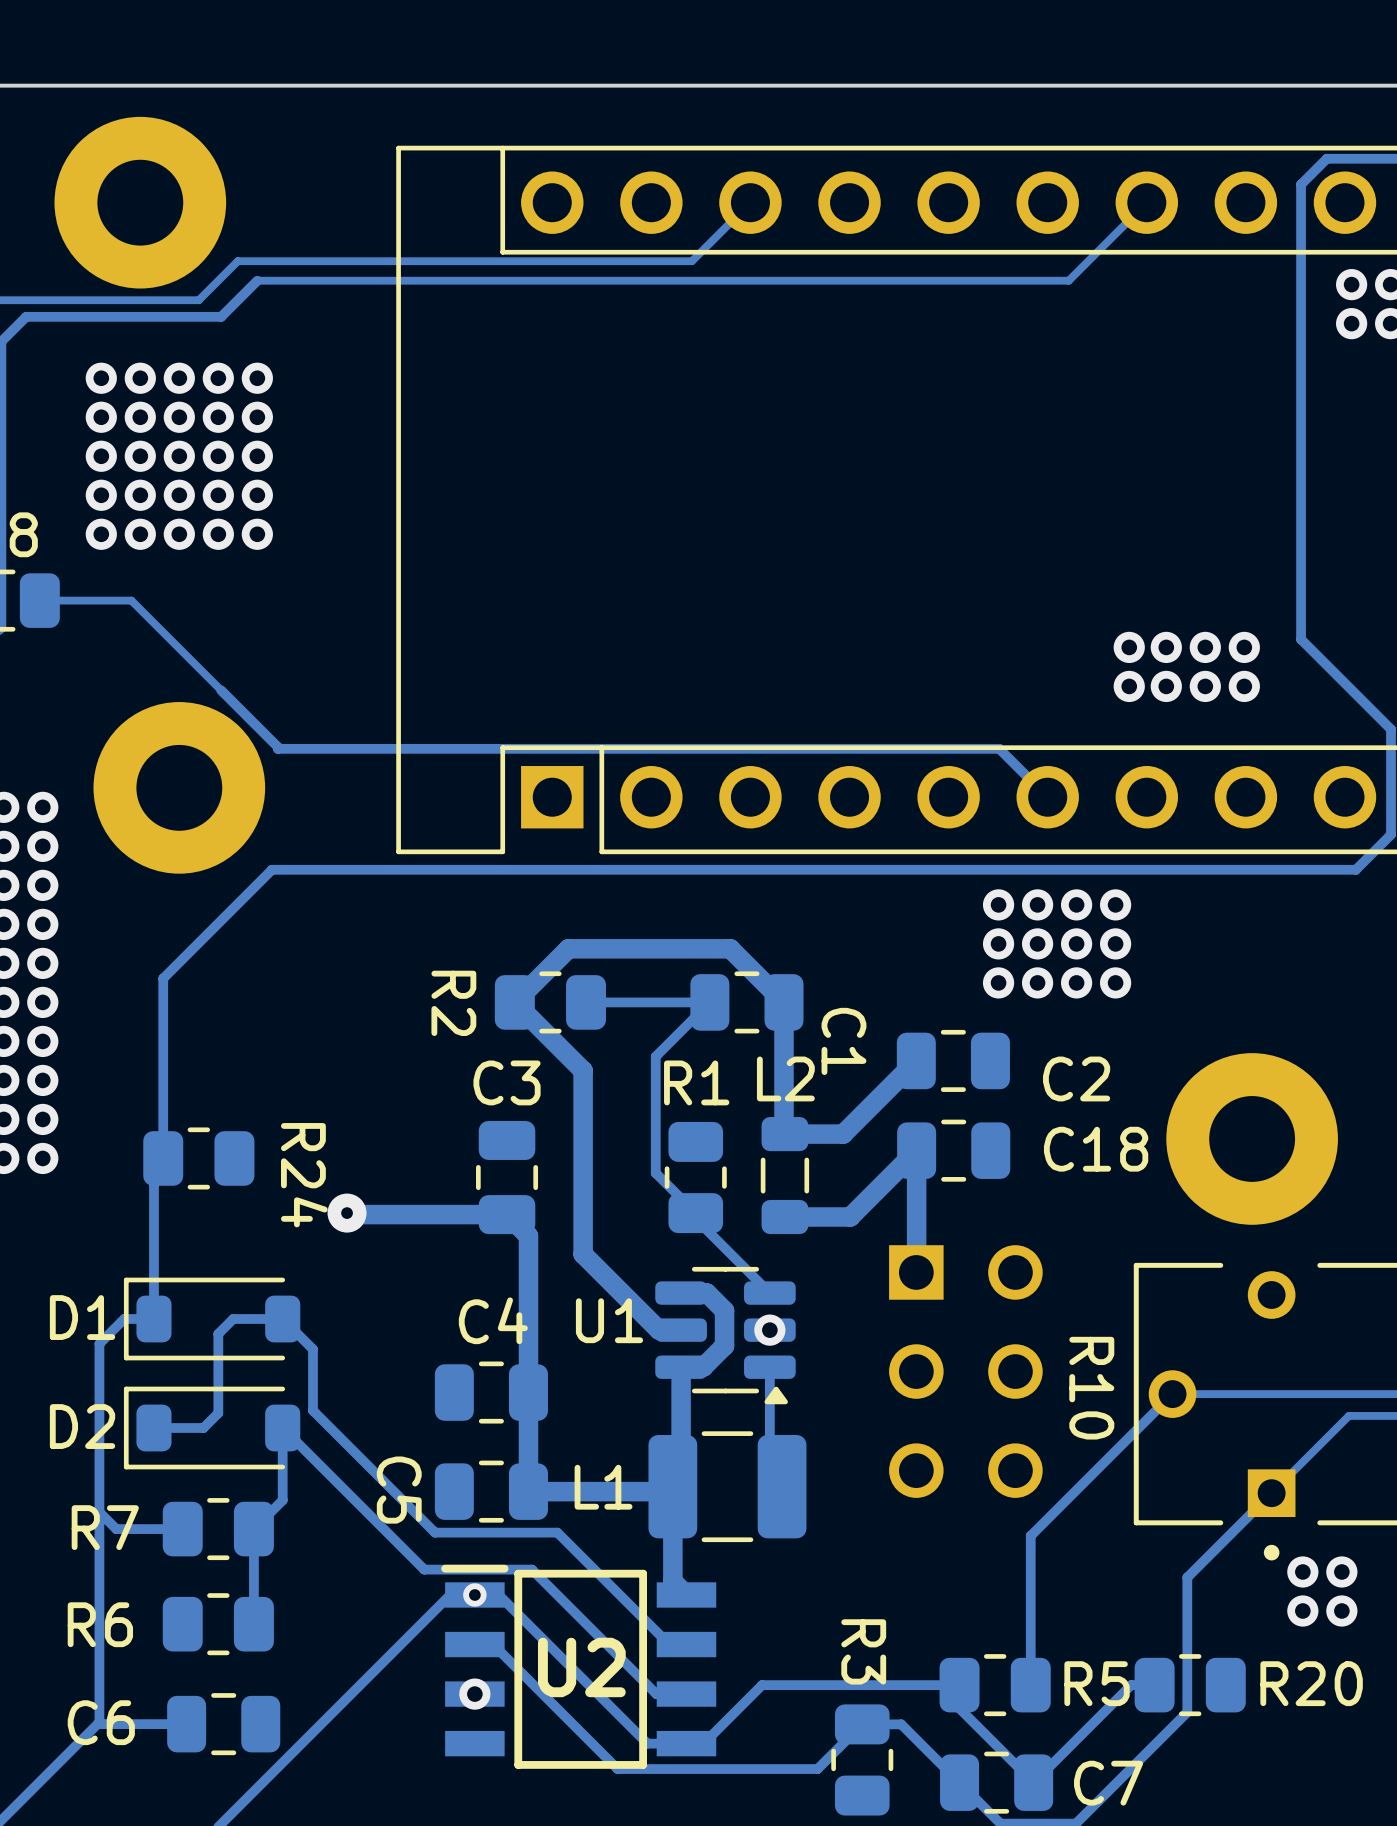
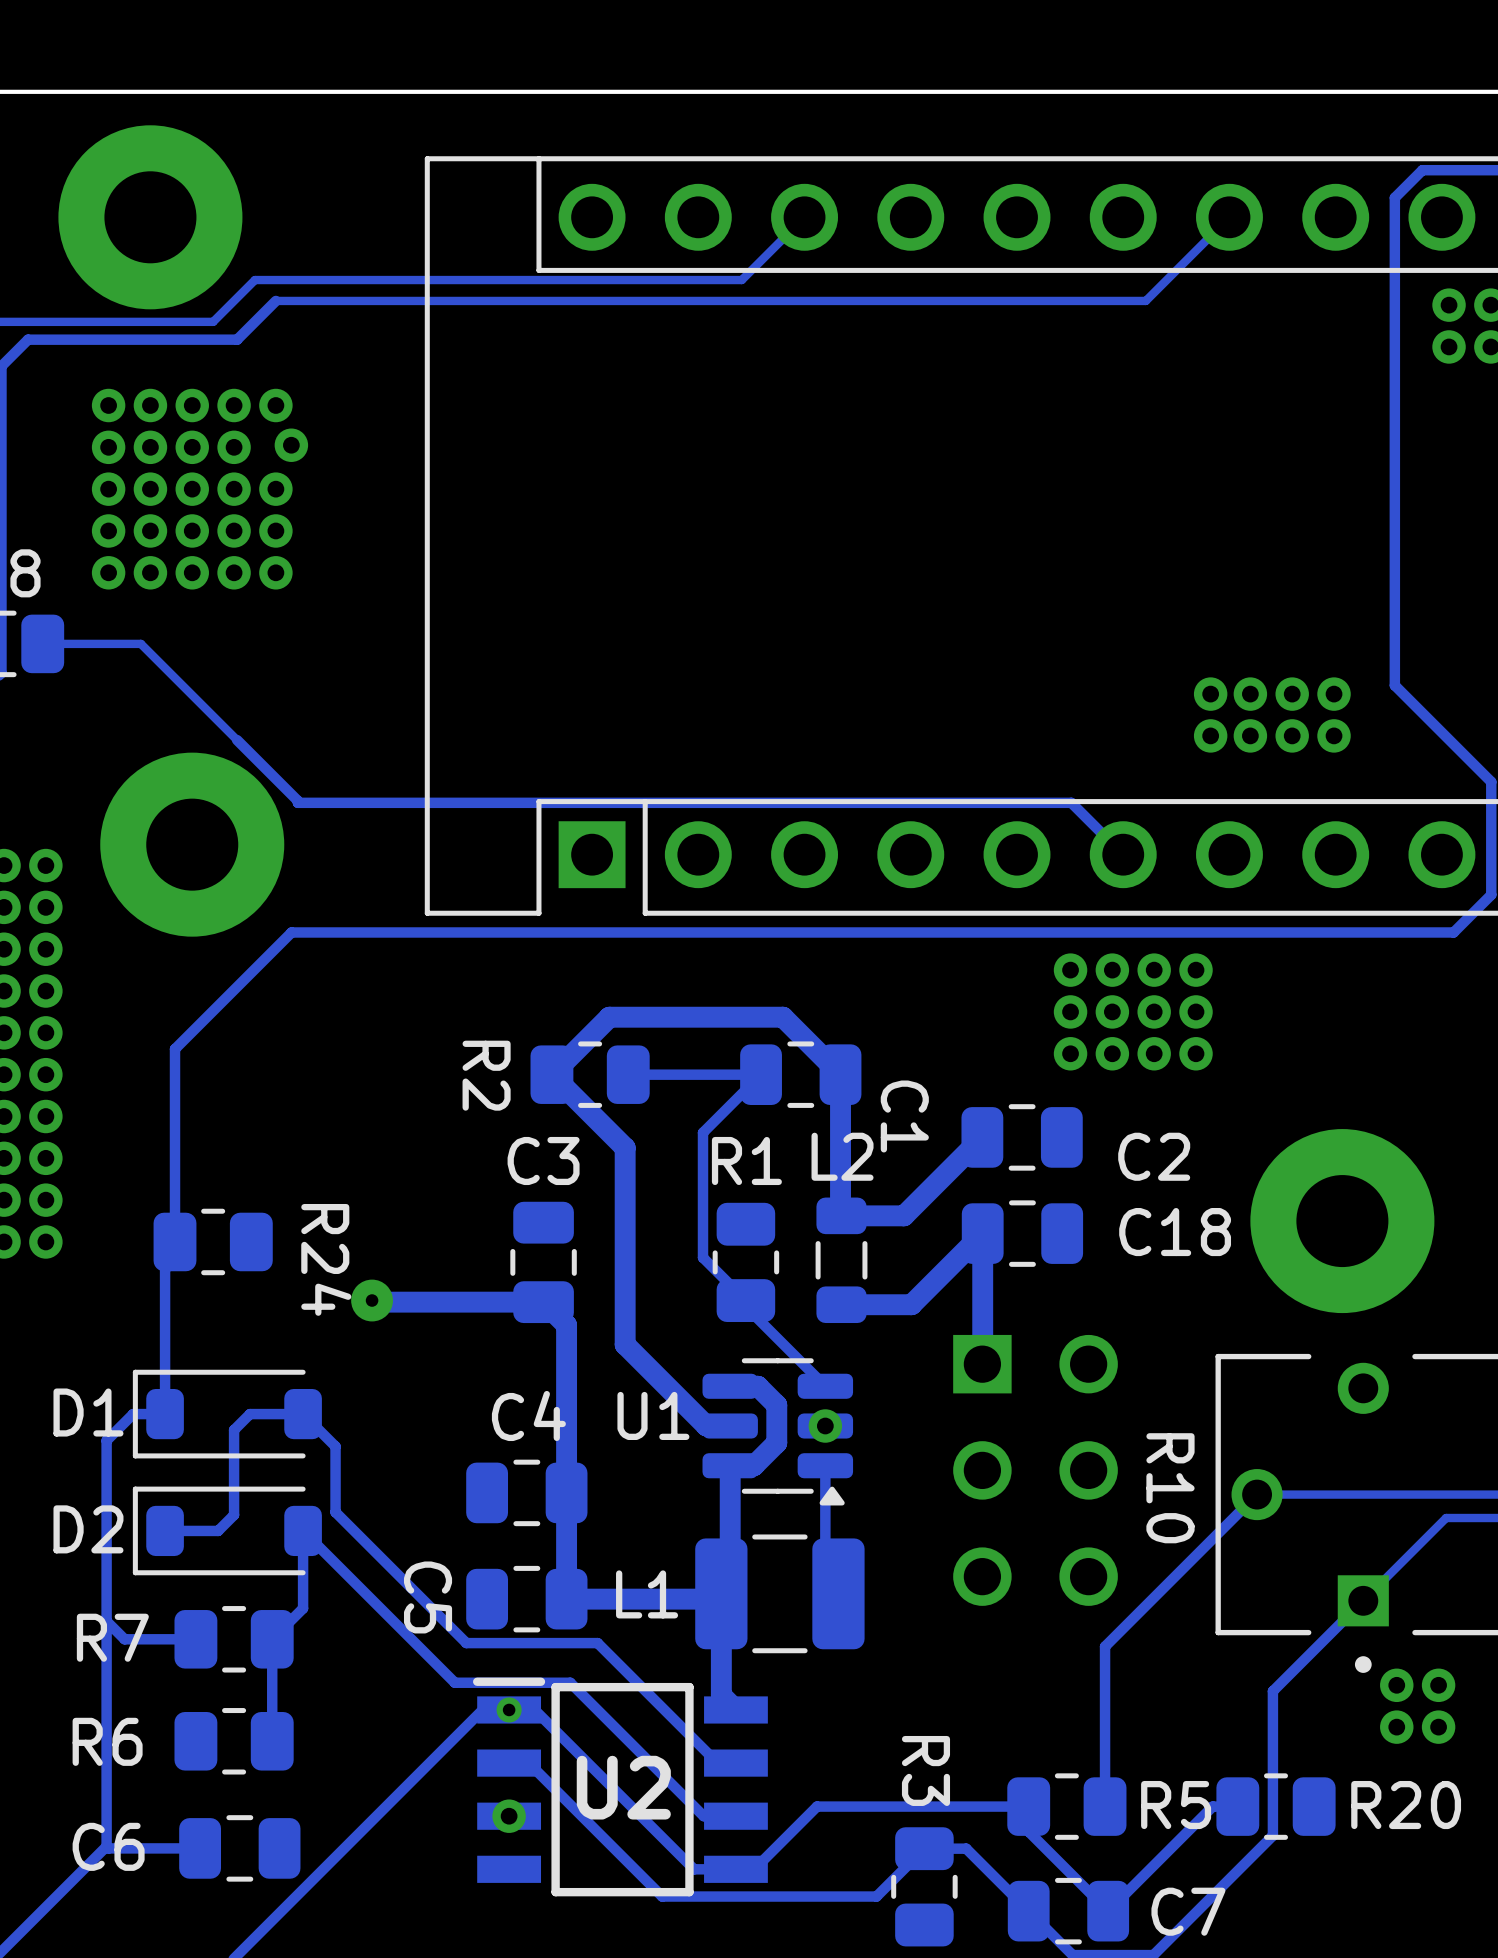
via position: (257, 417) -> (291, 445)

